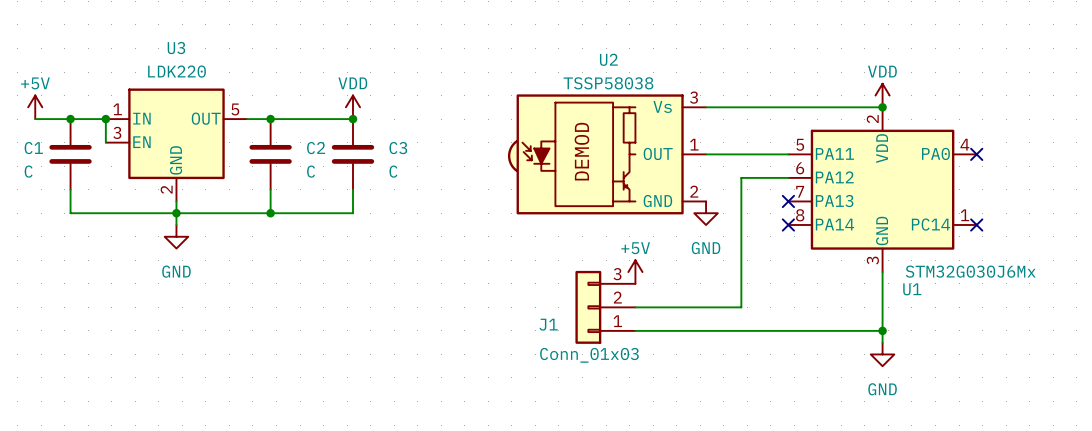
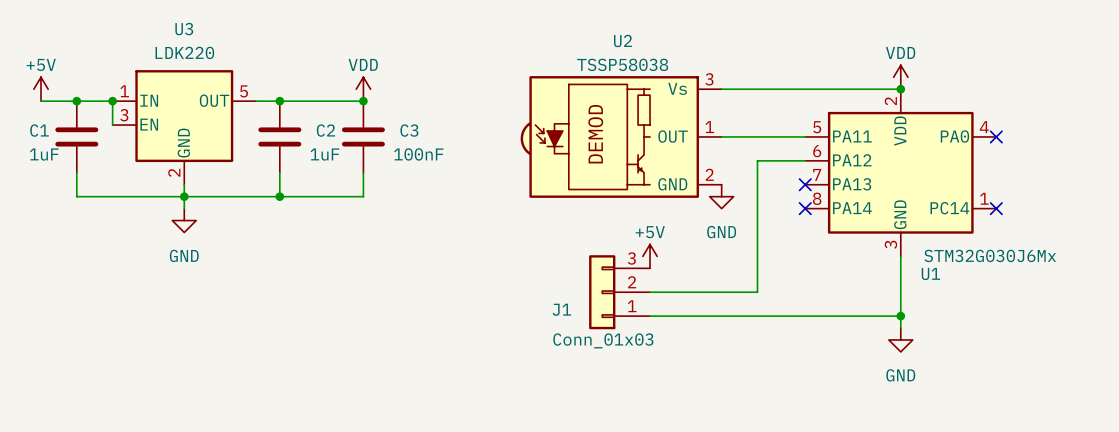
C1 value: C (28, 171) -> 1uF (44, 154)
C2 value: C (311, 171) -> 1uF (324, 154)
C3 value: C (393, 171) -> 100nF (418, 154)

